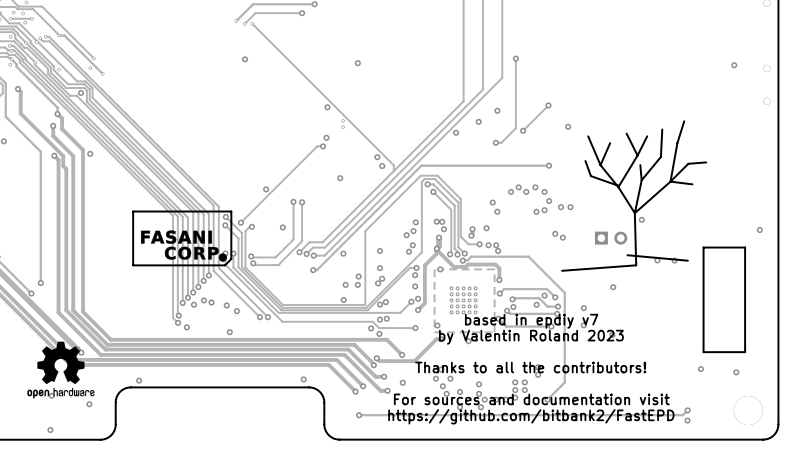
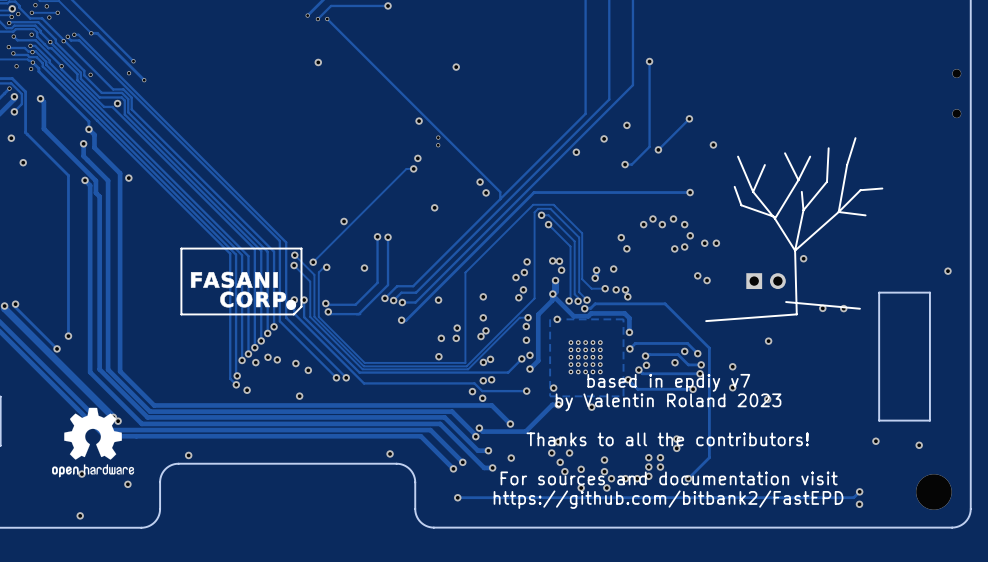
via: (734, 65) -> none

